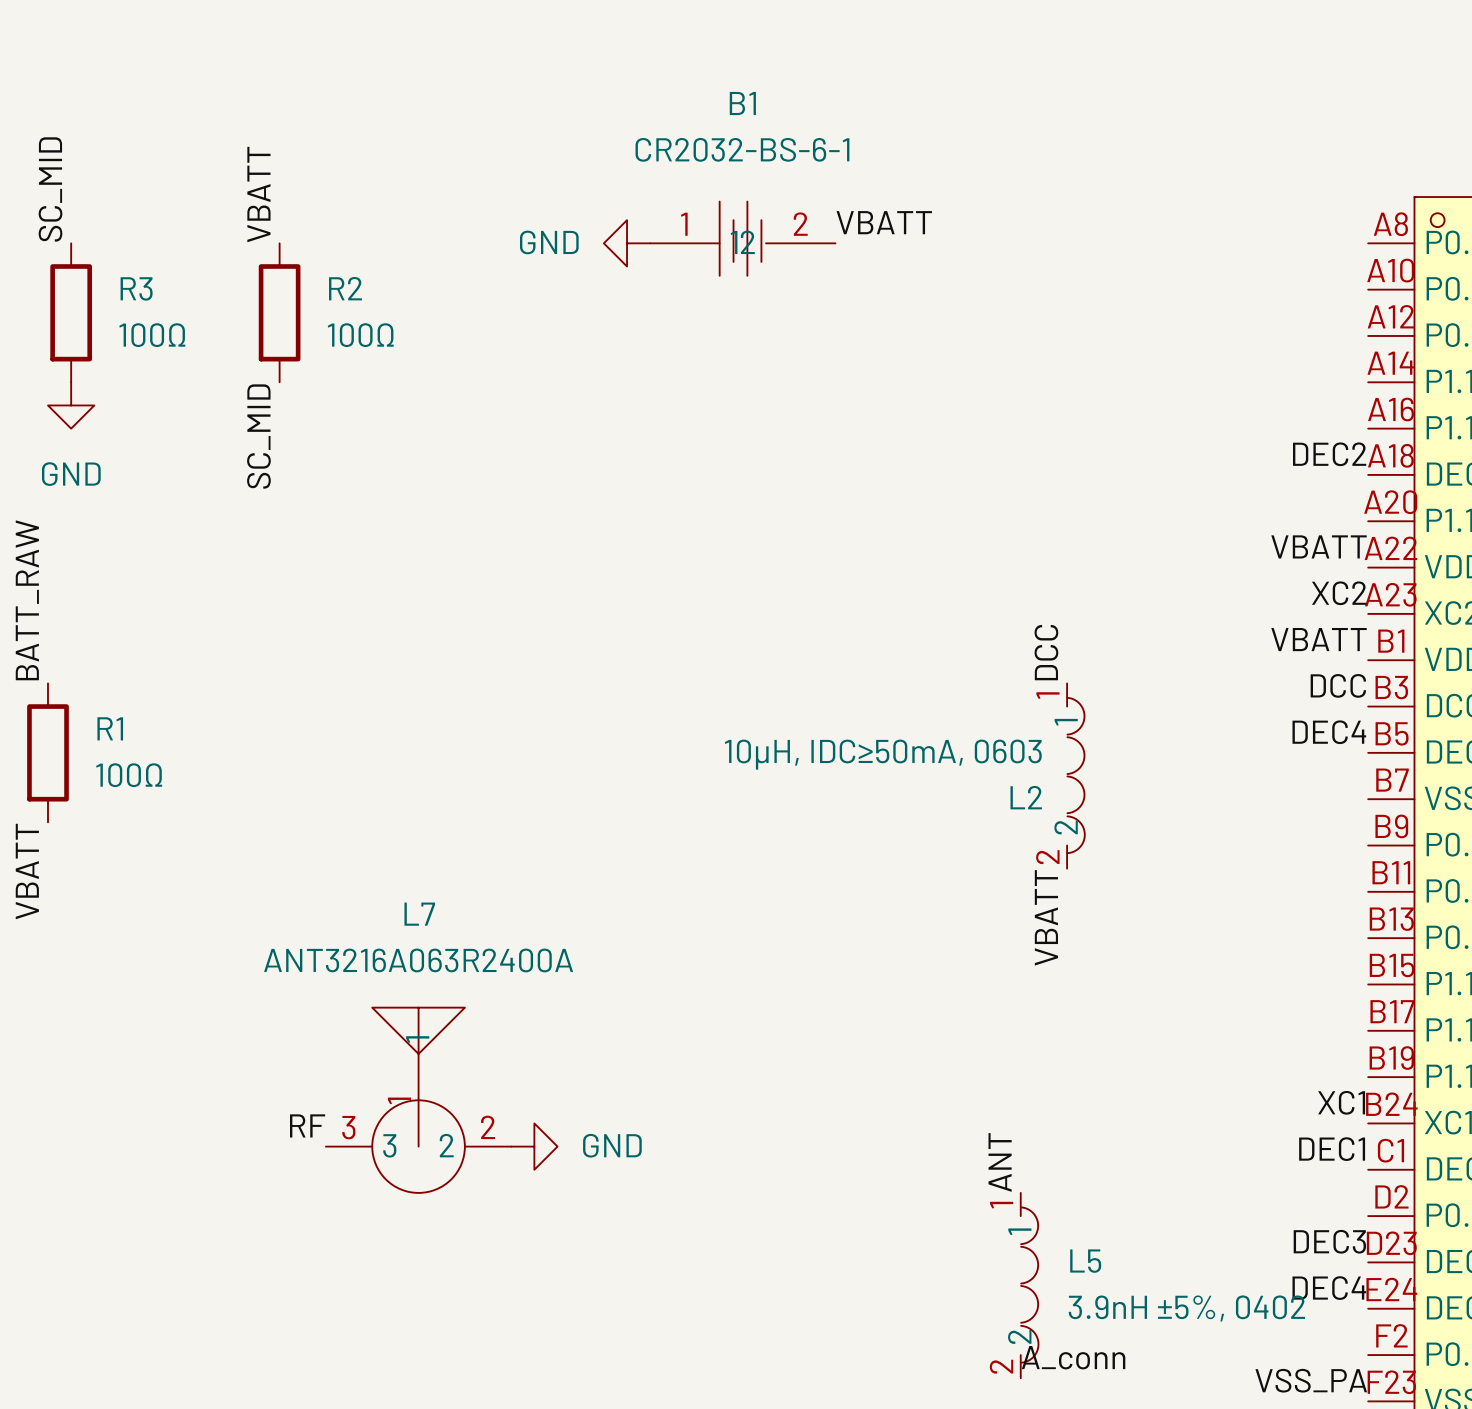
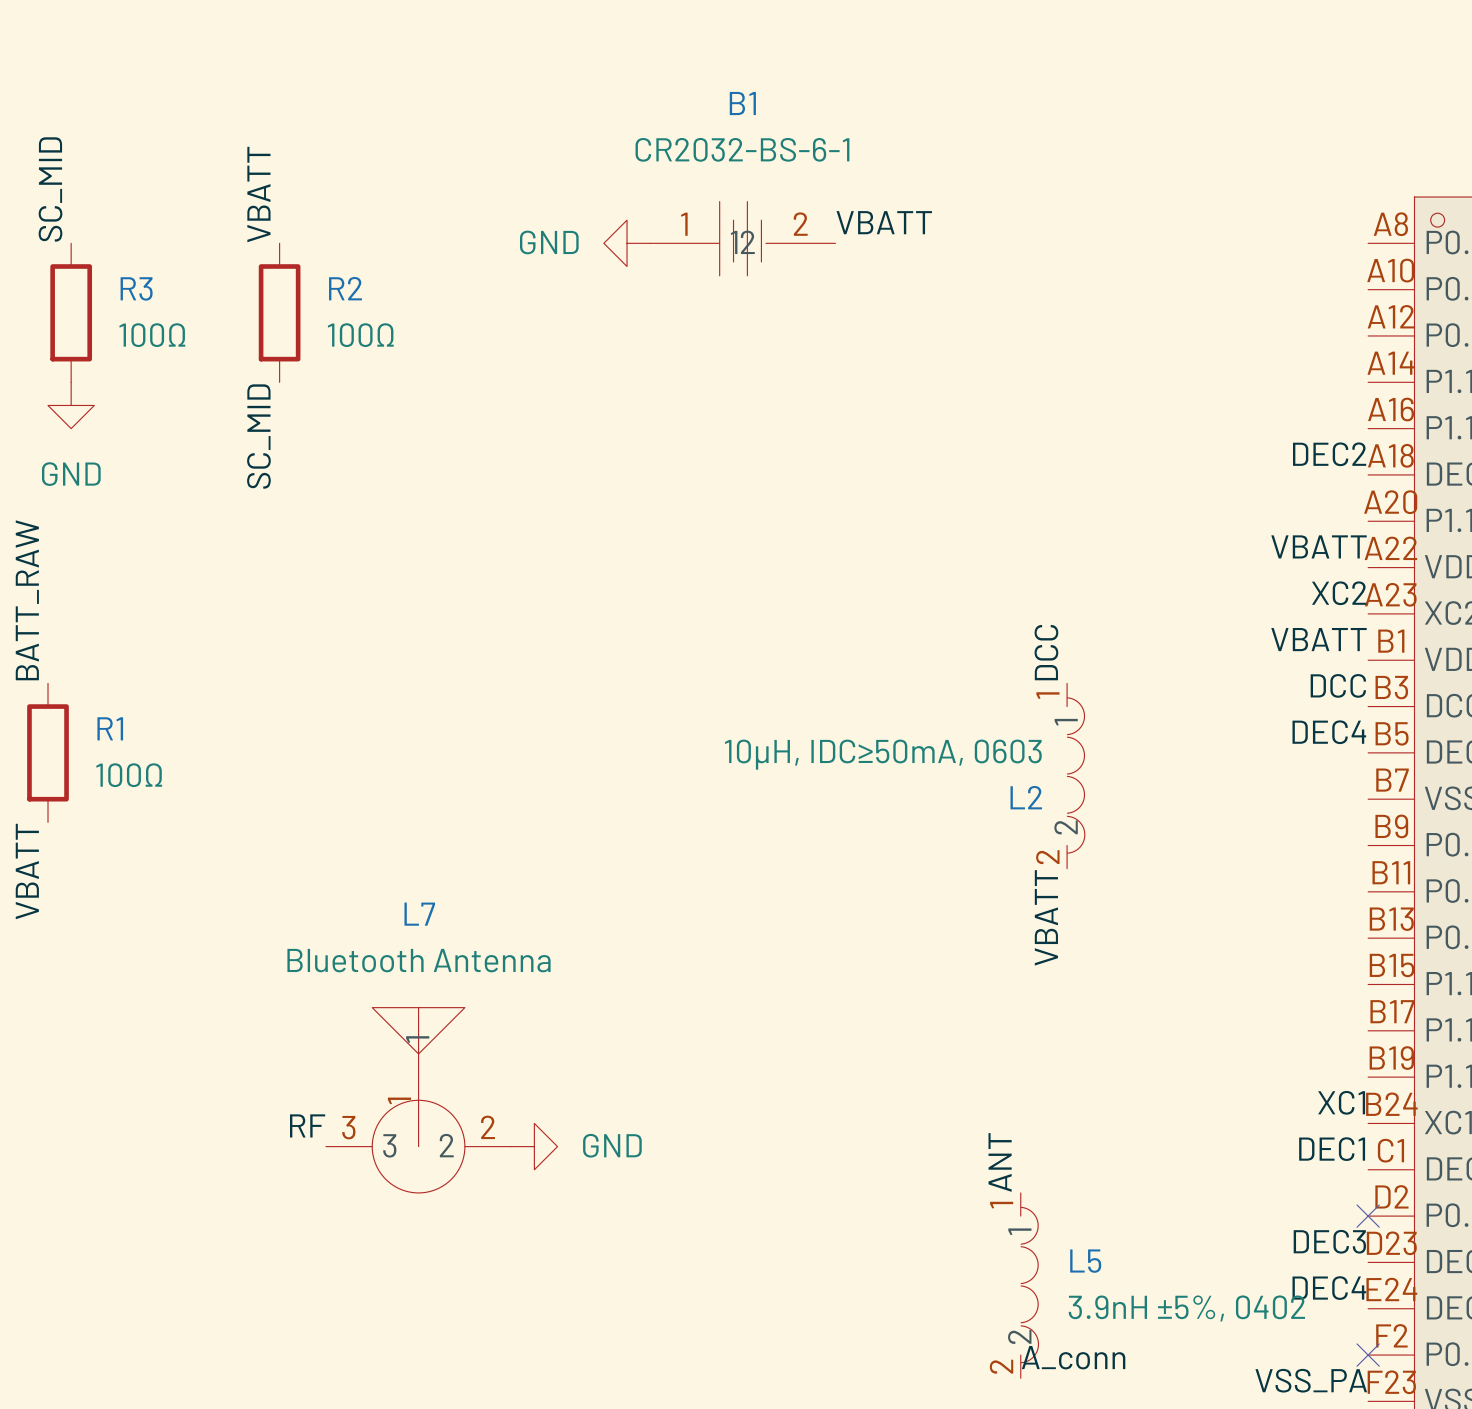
L7 value: ANT3216A063R2400A (418, 960) -> Bluetooth Antenna (419, 960)
no-connect mark: none -> (1368, 1216)
no-connect mark: none -> (1368, 1355)

